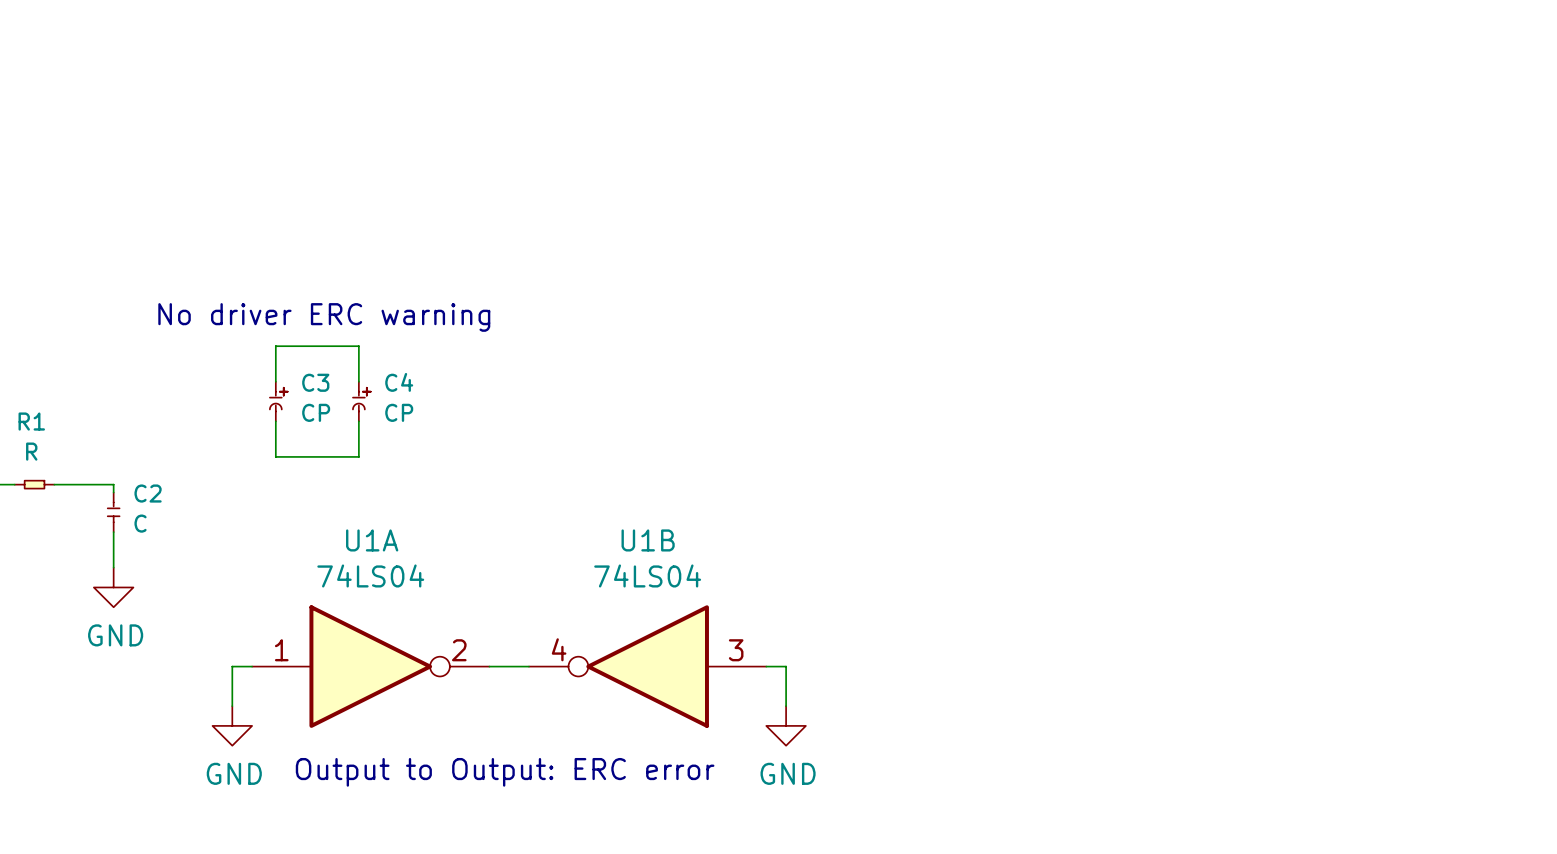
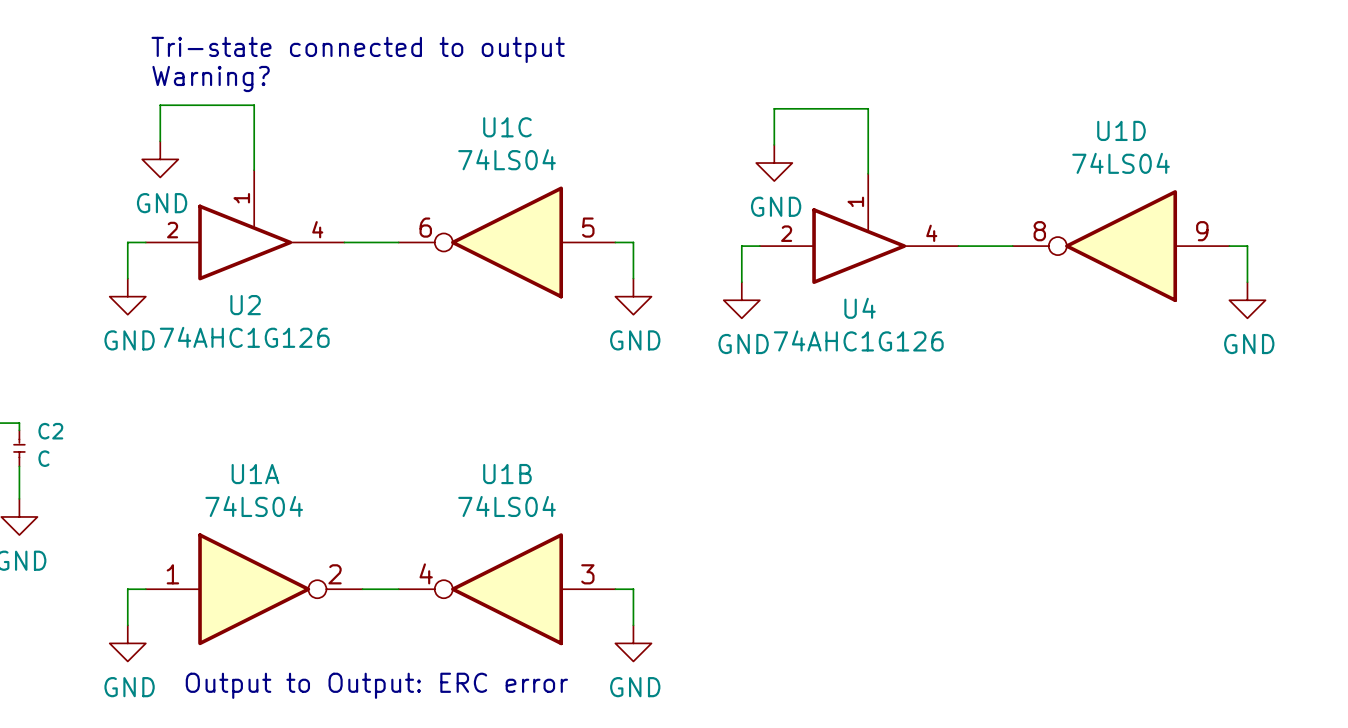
text: none -> Tri-state connected to output (358, 49)
text: none -> Warning? (211, 78)
wire: none -> (160, 141) (160, 105) (254, 105) (254, 170)
wire: none -> (774, 144) (774, 108) (868, 108) (868, 173)
power symbol: none -> GND (160, 159)
power symbol: none -> GND (774, 163)
U2: none -> 74AHC1G126 (245, 225)
U4: none -> 74AHC1G126 (859, 228)
wire: none -> (145, 242) (127, 242) (127, 278)
wire: none -> (344, 242) (398, 242)
U1C: none -> 74LS04 (507, 242)
wire: none -> (615, 242) (633, 242) (633, 278)
wire: none -> (759, 246) (741, 246) (741, 282)
wire: none -> (958, 246) (1012, 246)
U1D: none -> 74LS04 (1121, 246)
wire: none -> (1229, 246) (1247, 246) (1247, 282)
text: No driver ERC warning (324, 317) -> none
power symbol: none -> GND (127, 296)
power symbol: none -> GND (633, 296)
power symbol: none -> GND (741, 300)
power symbol: none -> GND (1247, 300)
wire: (275, 381) (275, 346) (358, 346) (358, 381) -> none
C3: CP (278, 401) -> none
C4: CP (361, 401) -> none
wire: (275, 421) (275, 456) (358, 456) (358, 421) -> none

